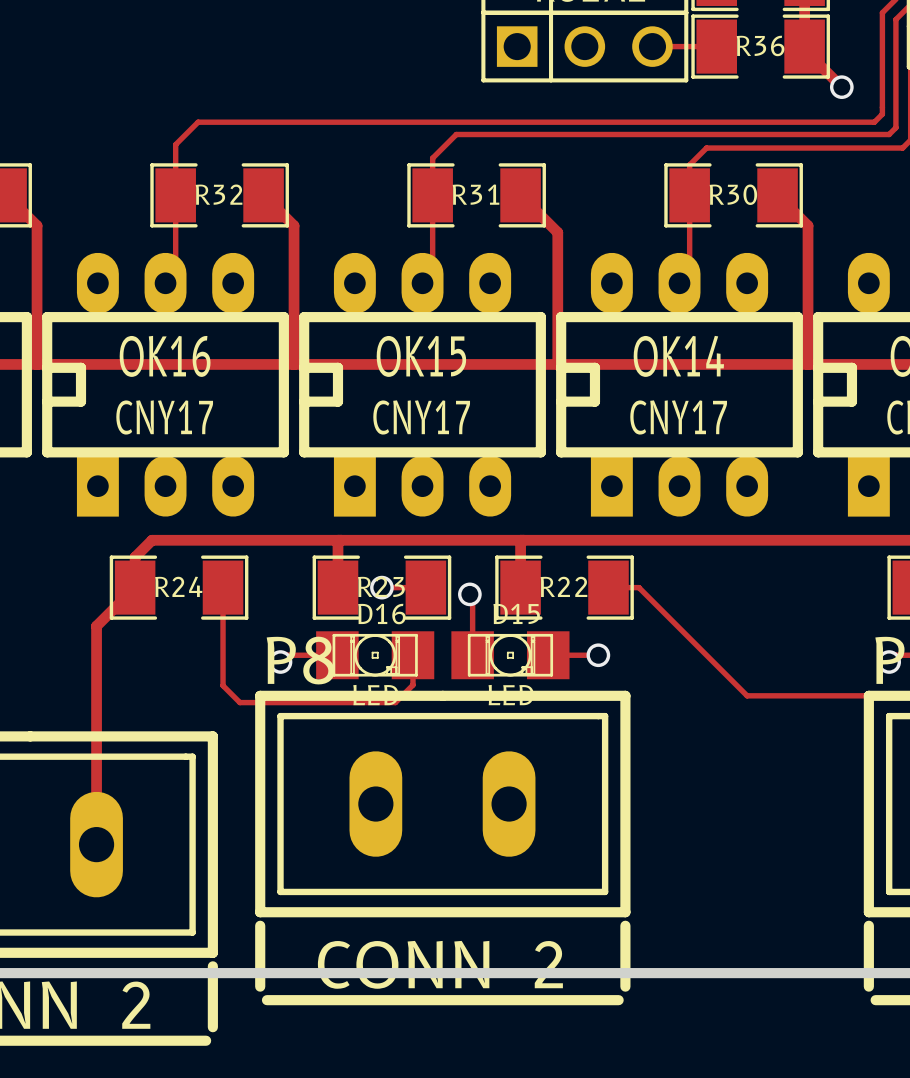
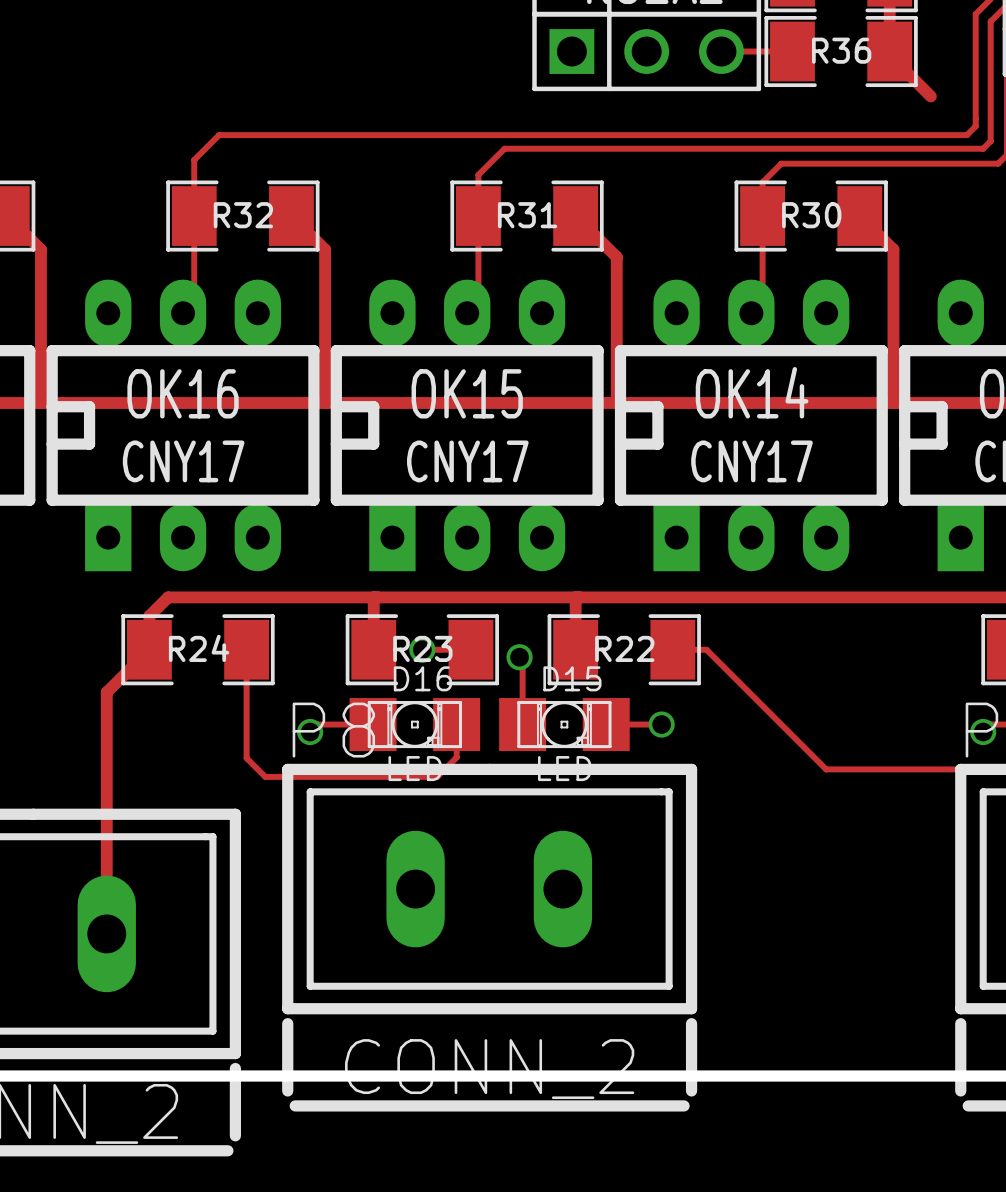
via: (841, 87) -> none

